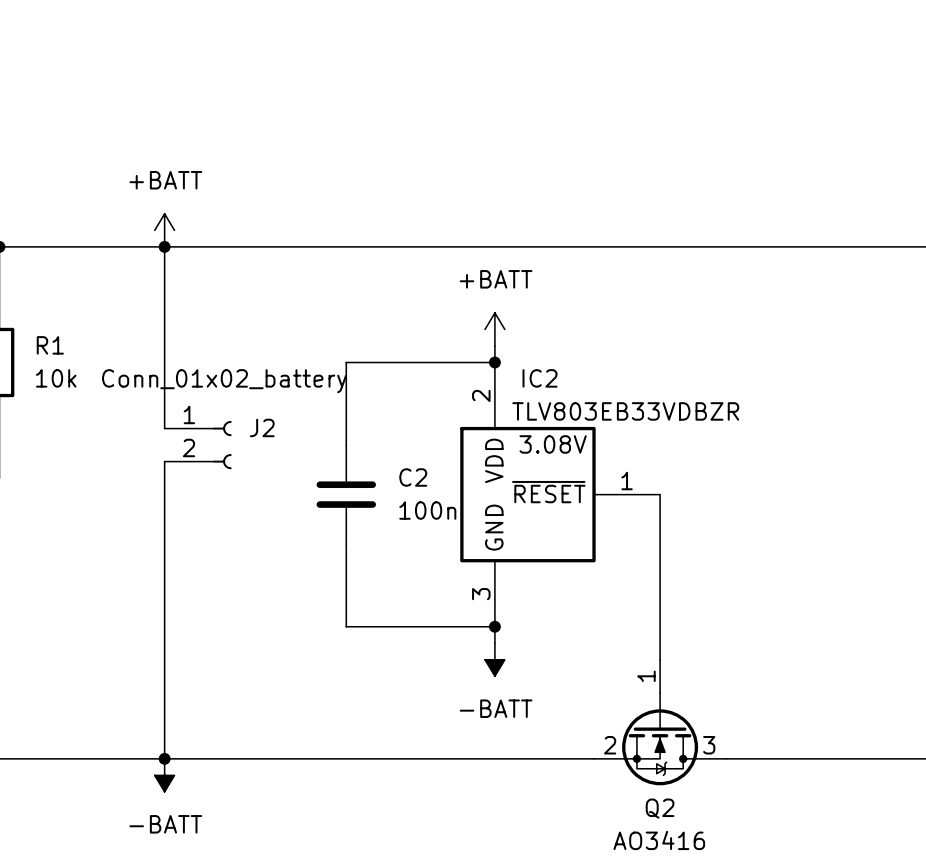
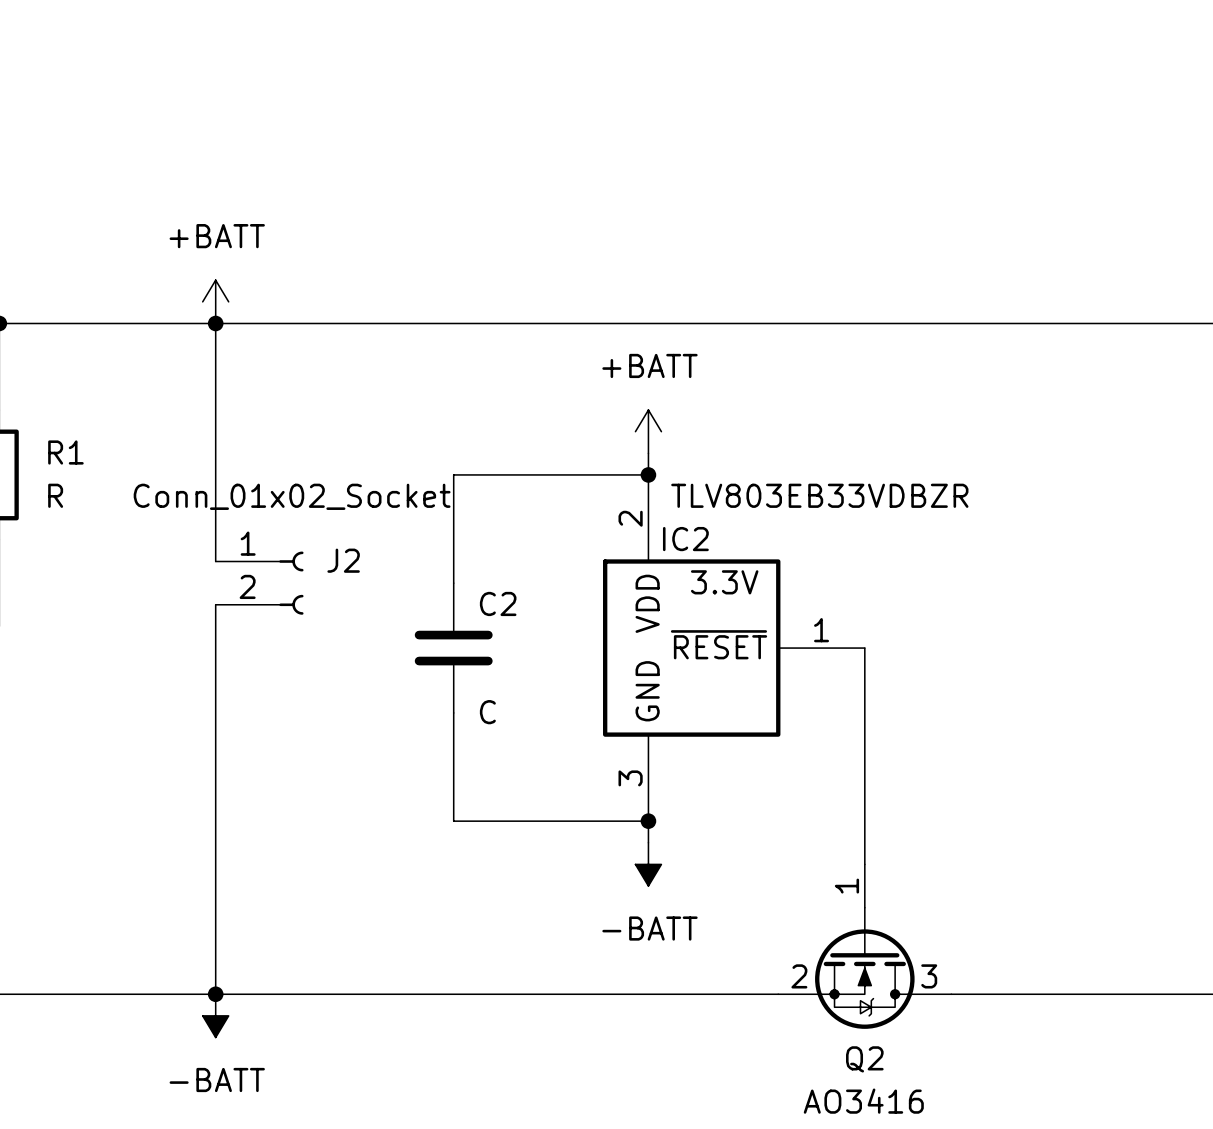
R1 value: 10k (56, 378) -> R (55, 495)
IC2 name position: IC2 (540, 378) -> IC2 (685, 539)
J2 value: Conn_01x02_battery (224, 381) -> Conn_01x02_Socket (292, 496)
IC2 value position: TLV803EB33VDBZR (625, 411) -> TLV803EB33VDBZR (819, 495)
IC2 text: 3.08V (553, 444) -> 3.3V (724, 582)
C2 name position: C2 (413, 477) -> C2 (498, 603)
C2 value: 100n (427, 510) -> C (487, 712)

